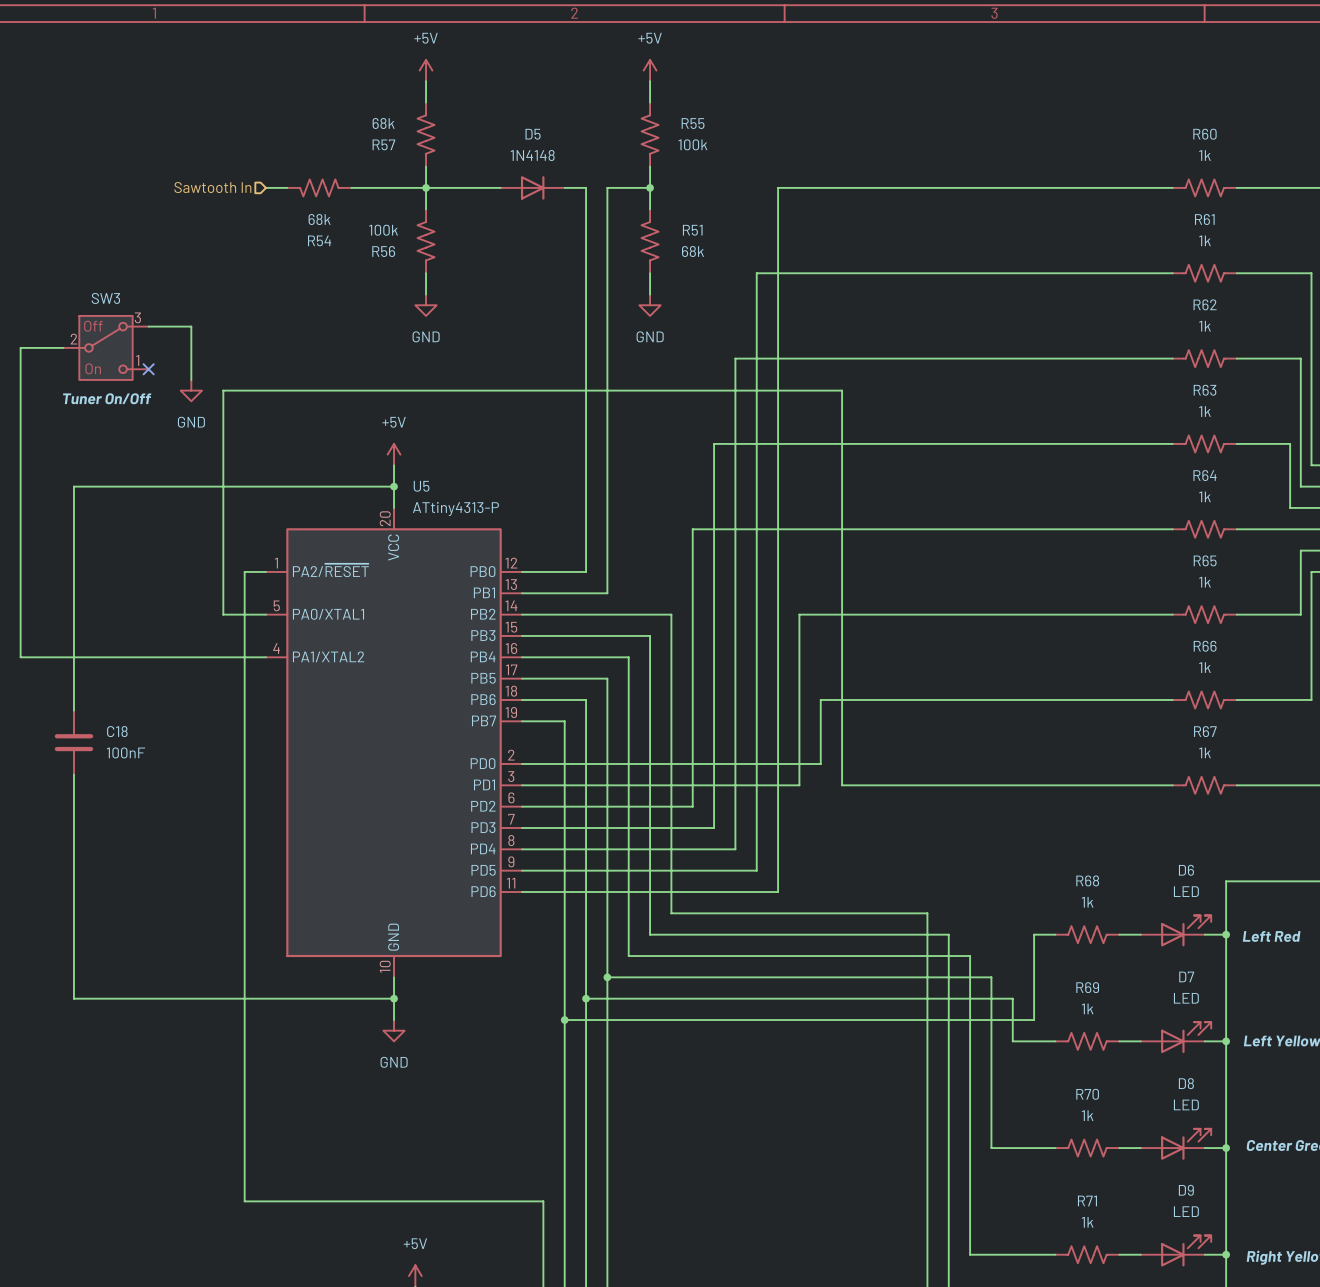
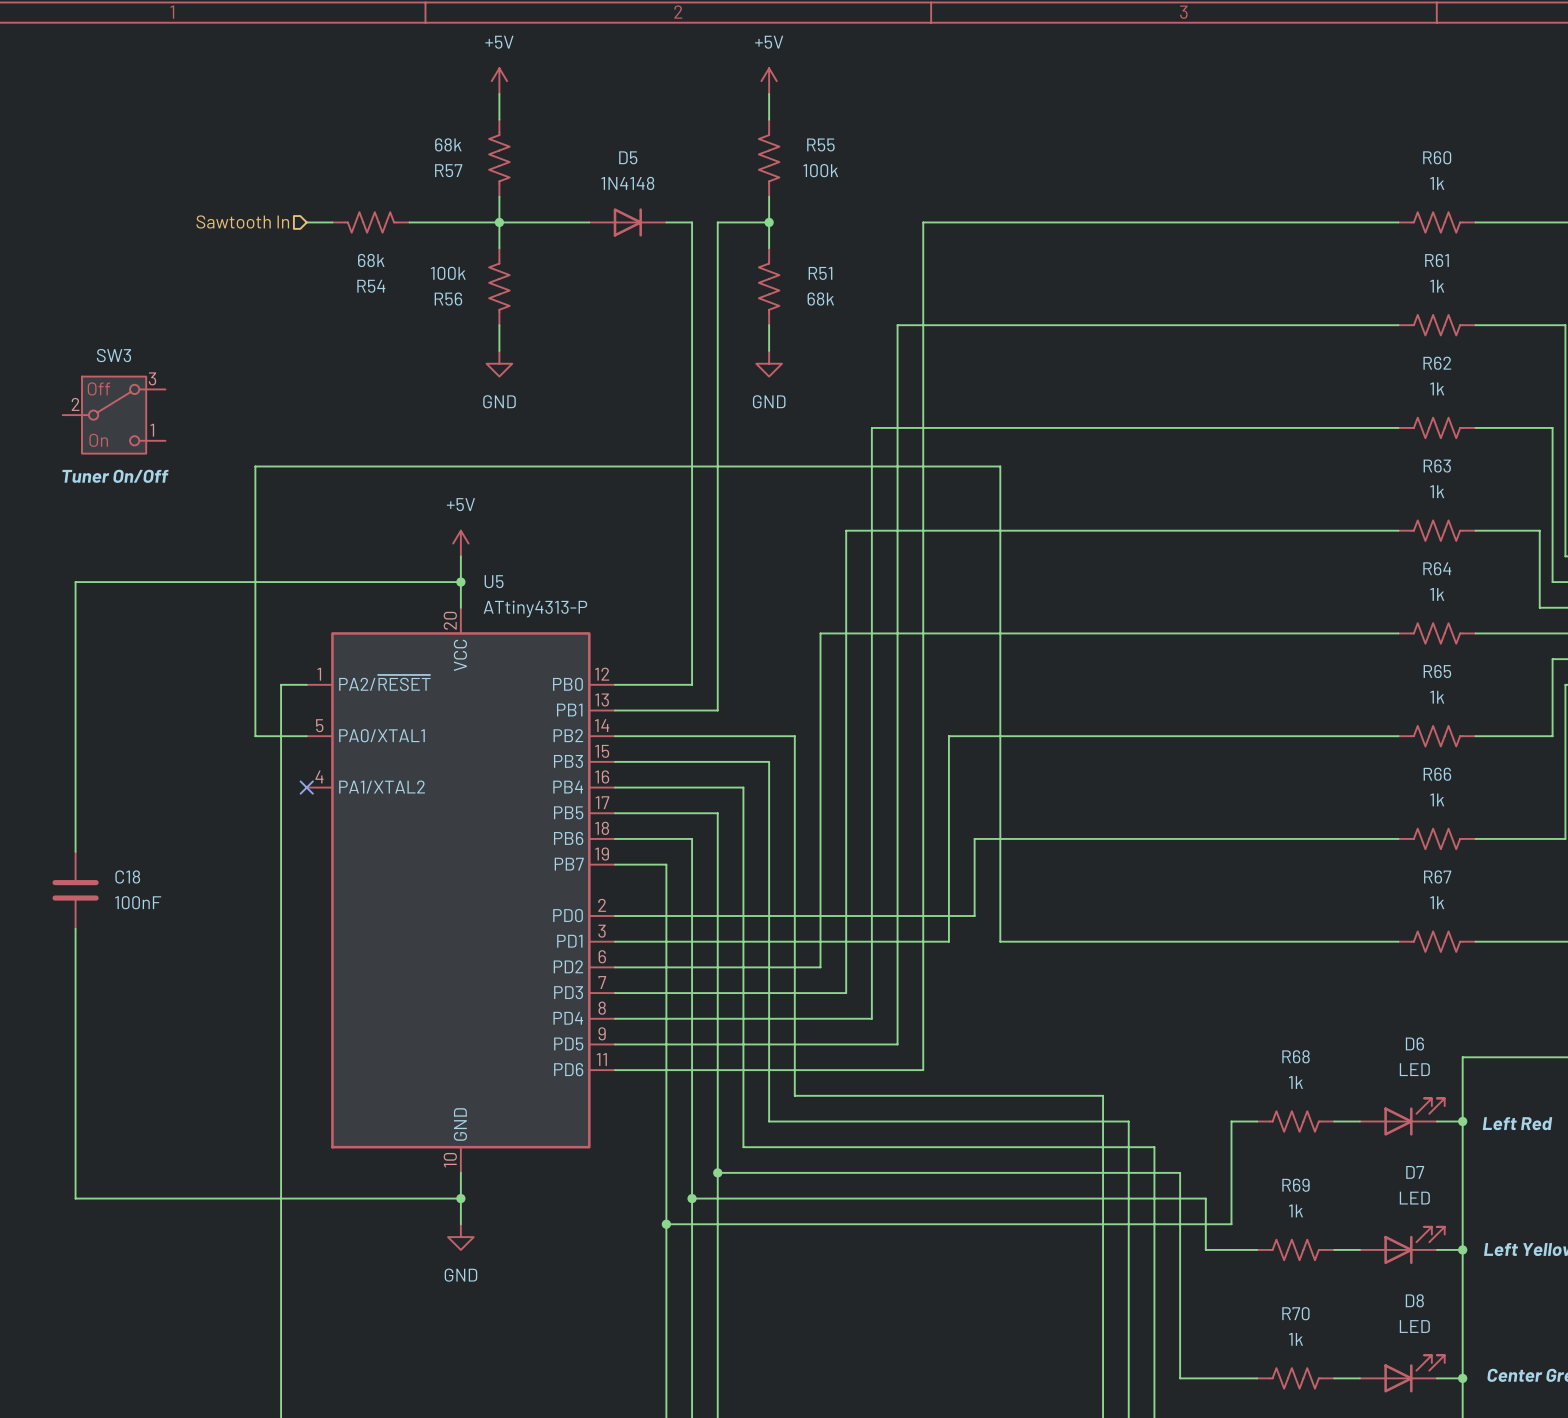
wire: (148, 326) (191, 326) (191, 379) -> none
wire: (63, 347) (20, 347) (20, 657) (266, 657) -> none
no-connect mark: (148, 369) -> none
power symbol: GND (191, 390) -> none
no-connect mark: none -> (306, 787)

